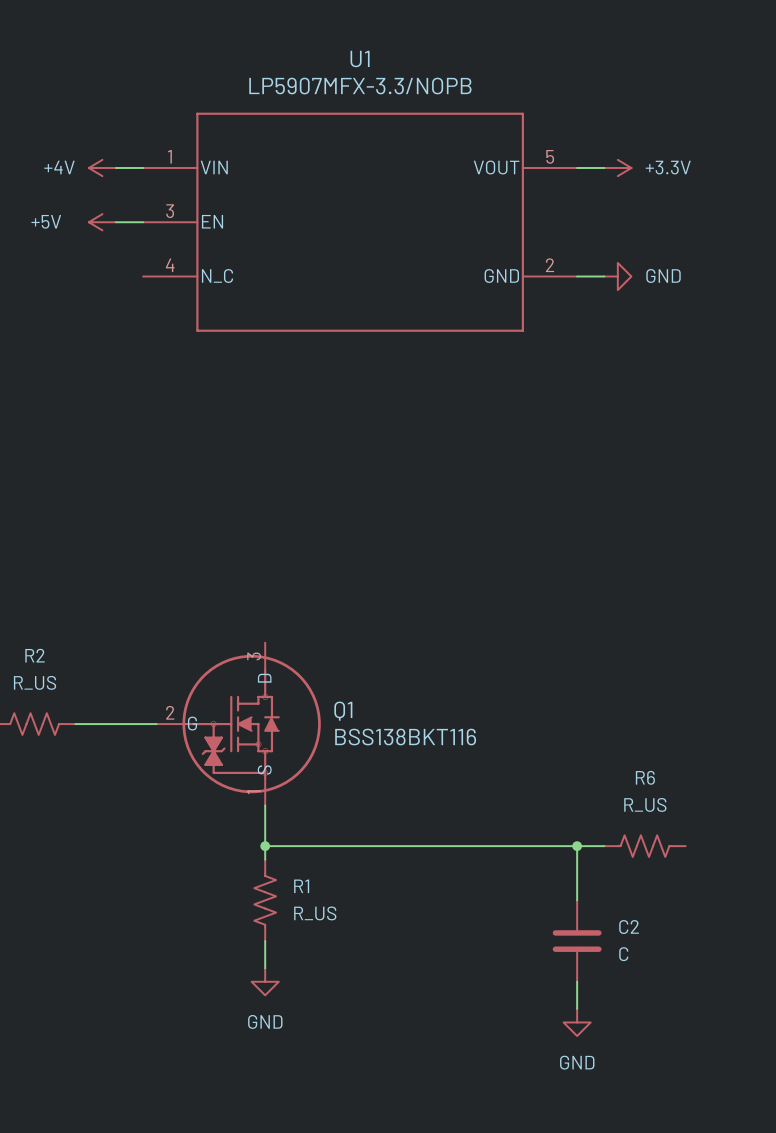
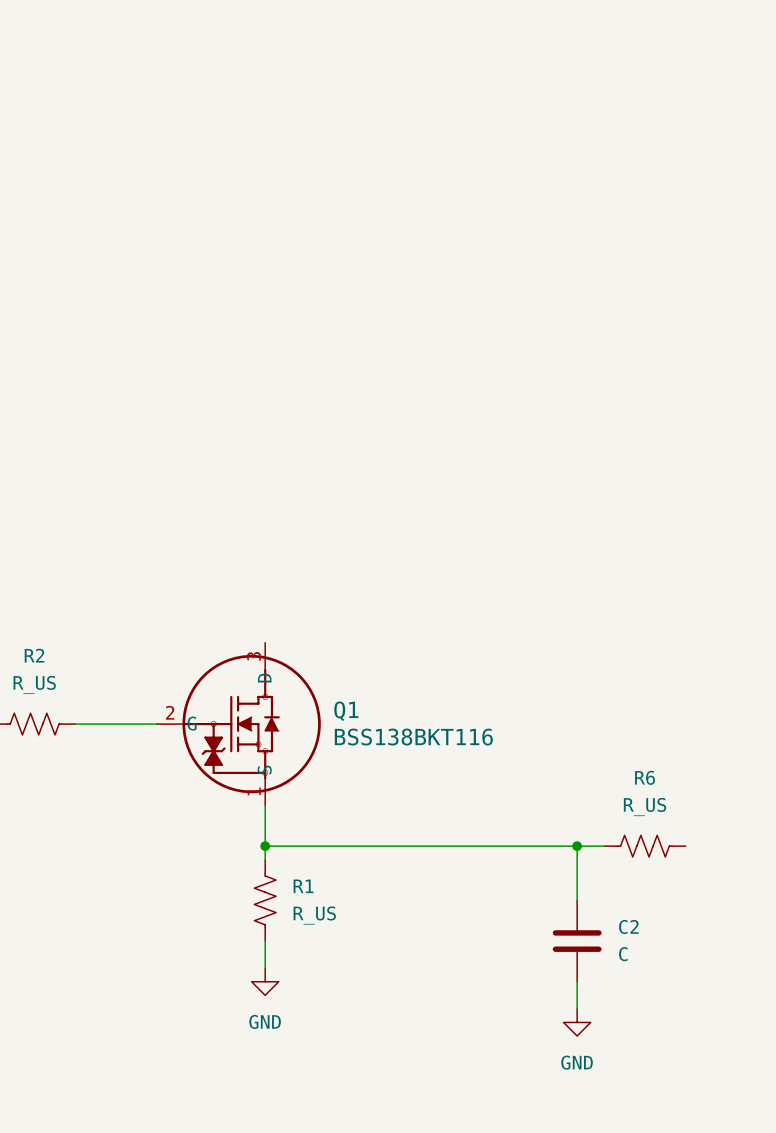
power symbol: +4V (102, 168) -> none
wire: (116, 168) (143, 168) -> none
wire: (577, 168) (604, 168) -> none
power symbol: +3.3V (617, 168) -> none
power symbol: +5V (102, 222) -> none
wire: (116, 222) (143, 222) -> none
U1: LP5907MFX-3.3/NOPB (360, 222) -> none
wire: (577, 276) (604, 276) -> none
power symbol: GND (617, 276) -> none

